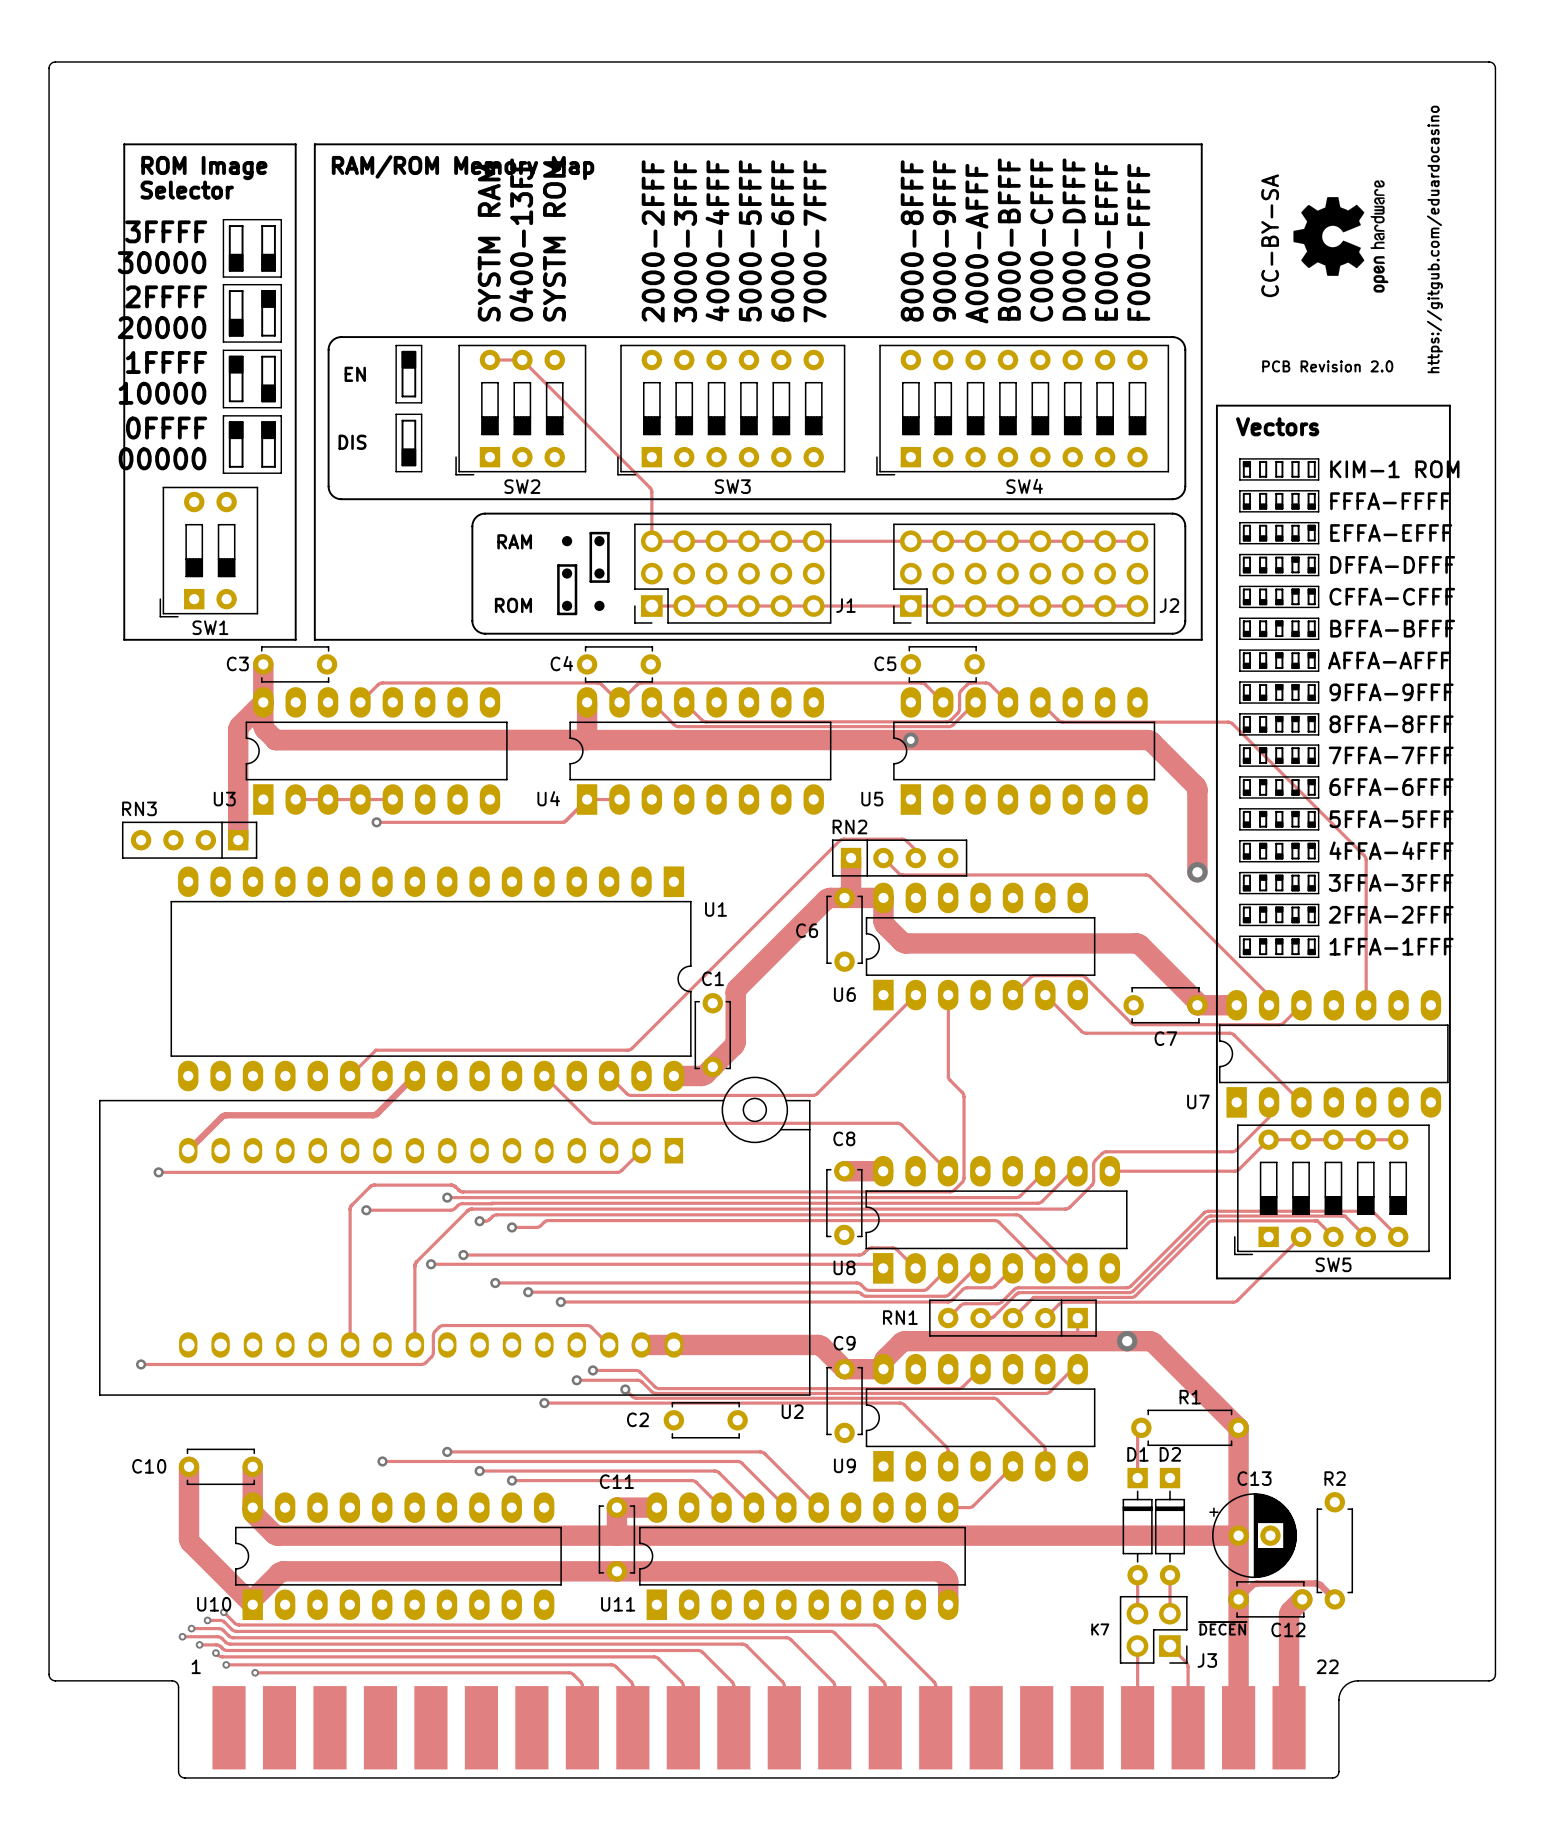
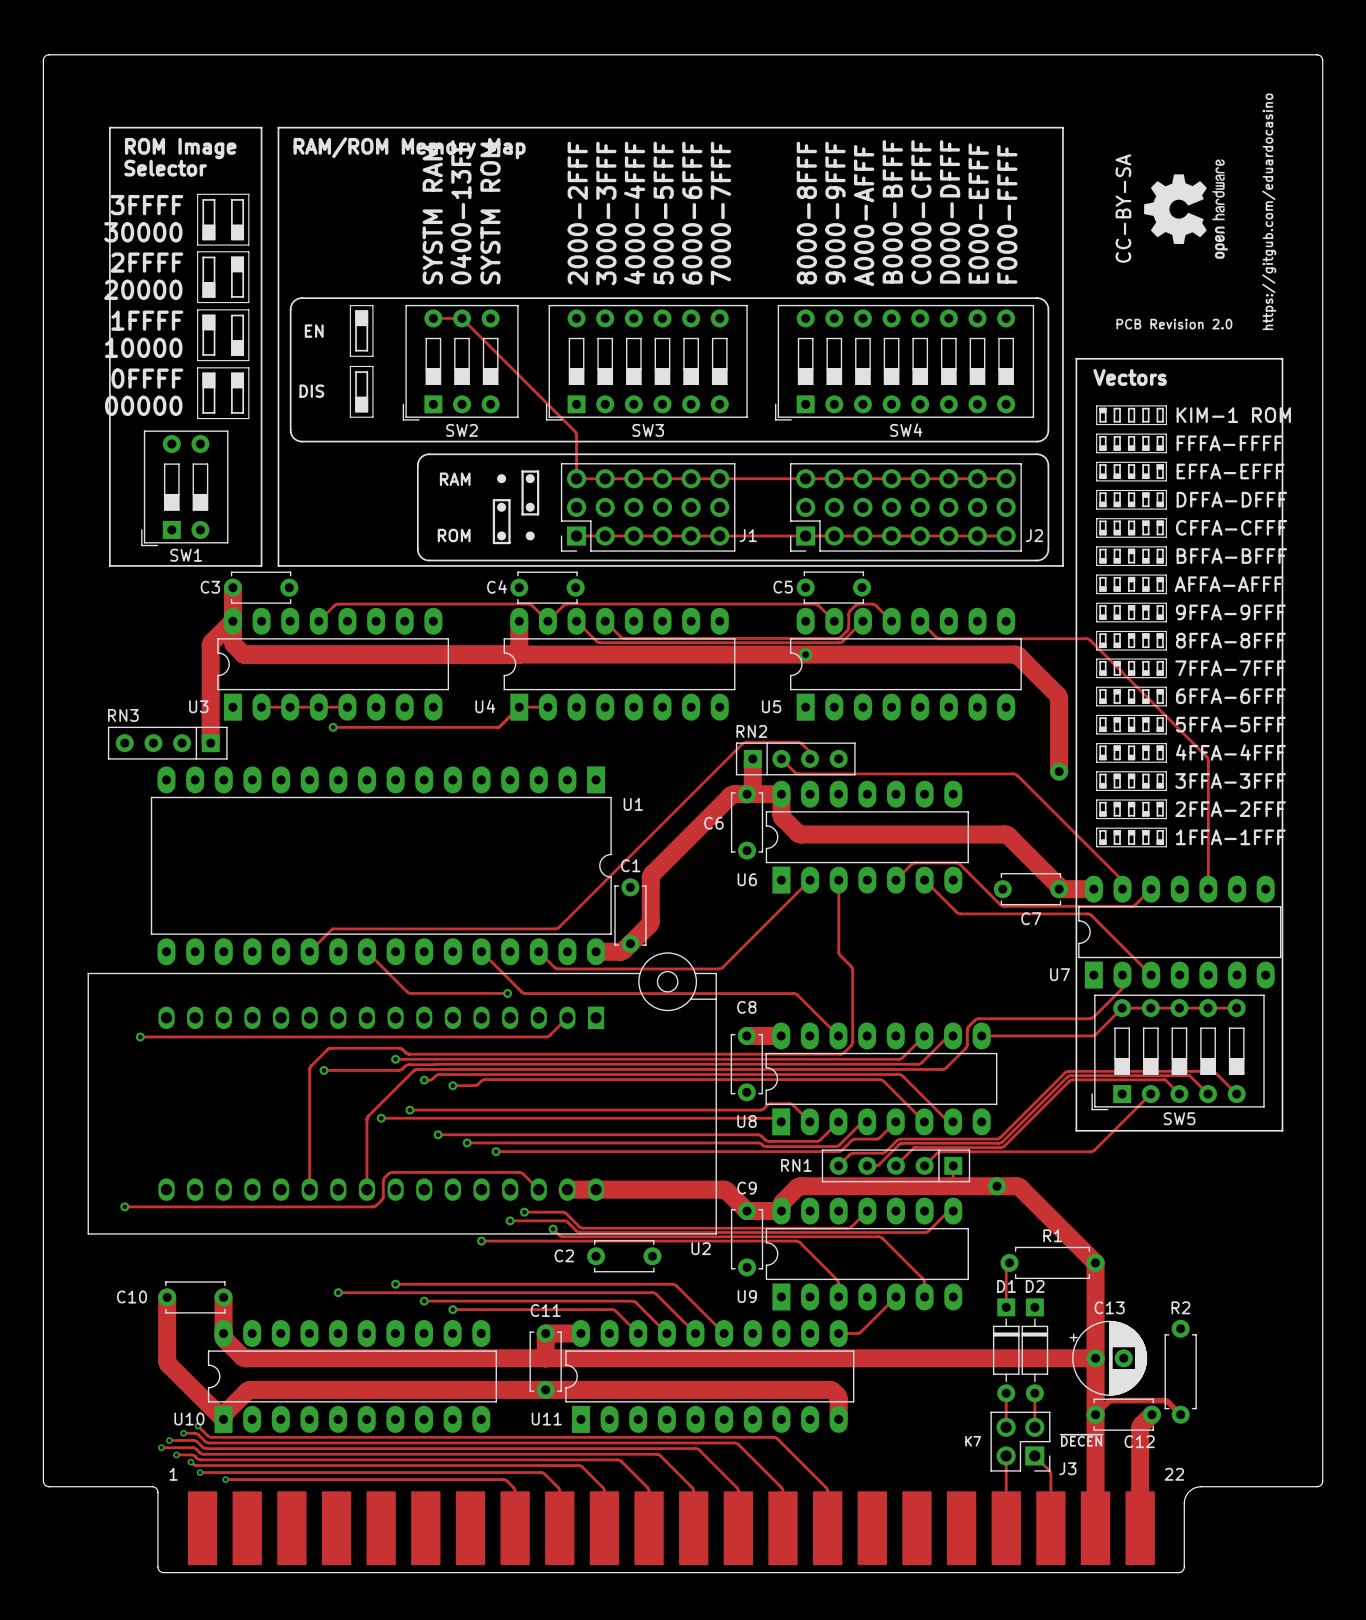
track: (414, 1076) (374, 1114) (225, 1115) (188, 1150) -> (366, 951) (409, 993) (507, 993)
via: none -> (507, 993)

